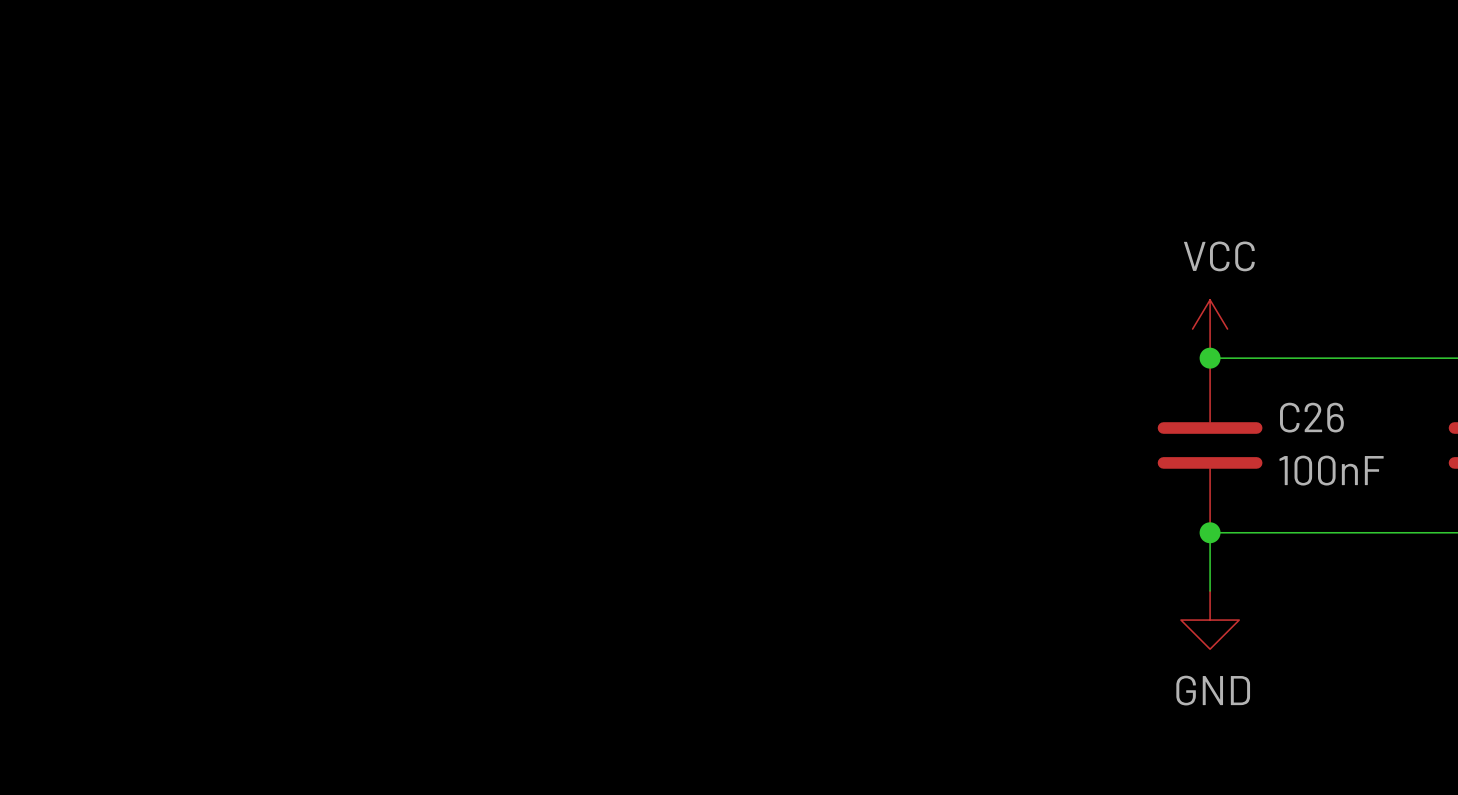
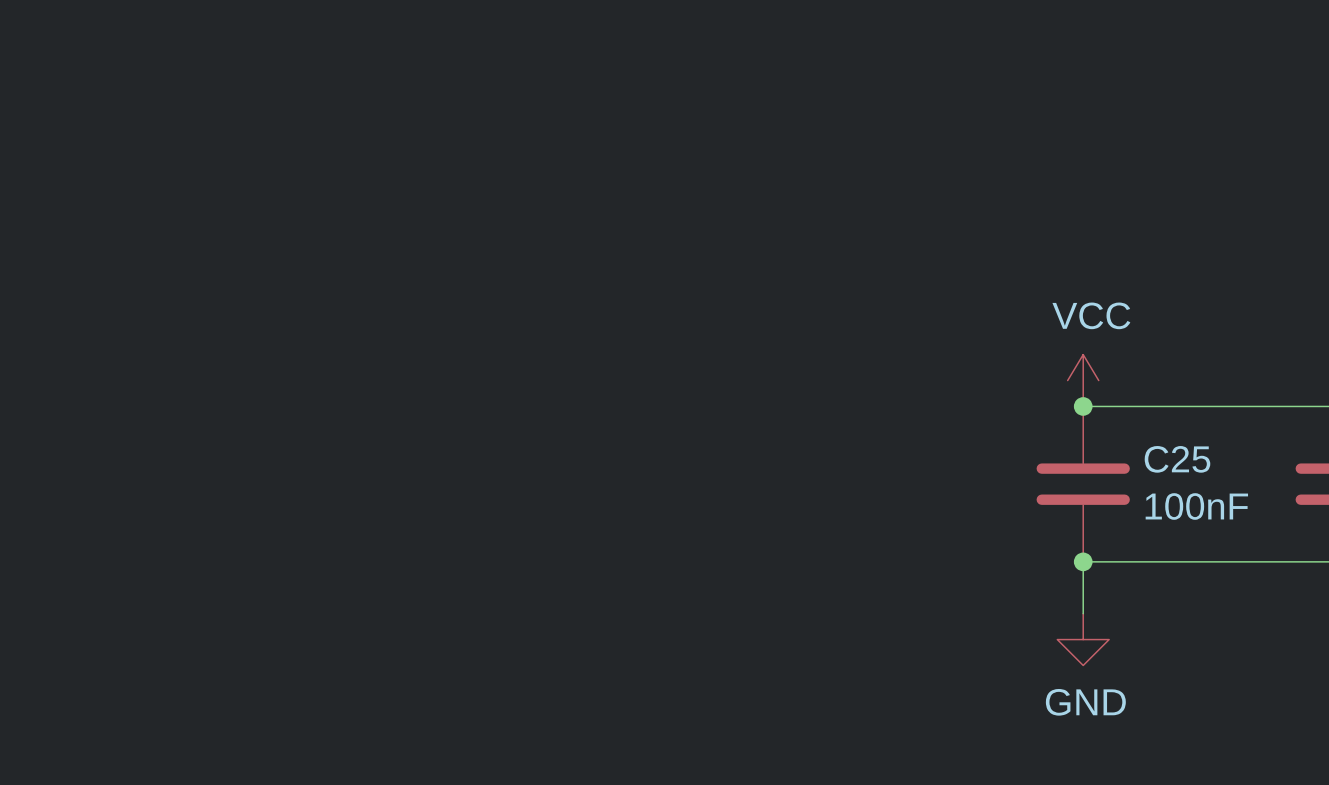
C26 name: C26 (1311, 417) -> C25 (1177, 459)

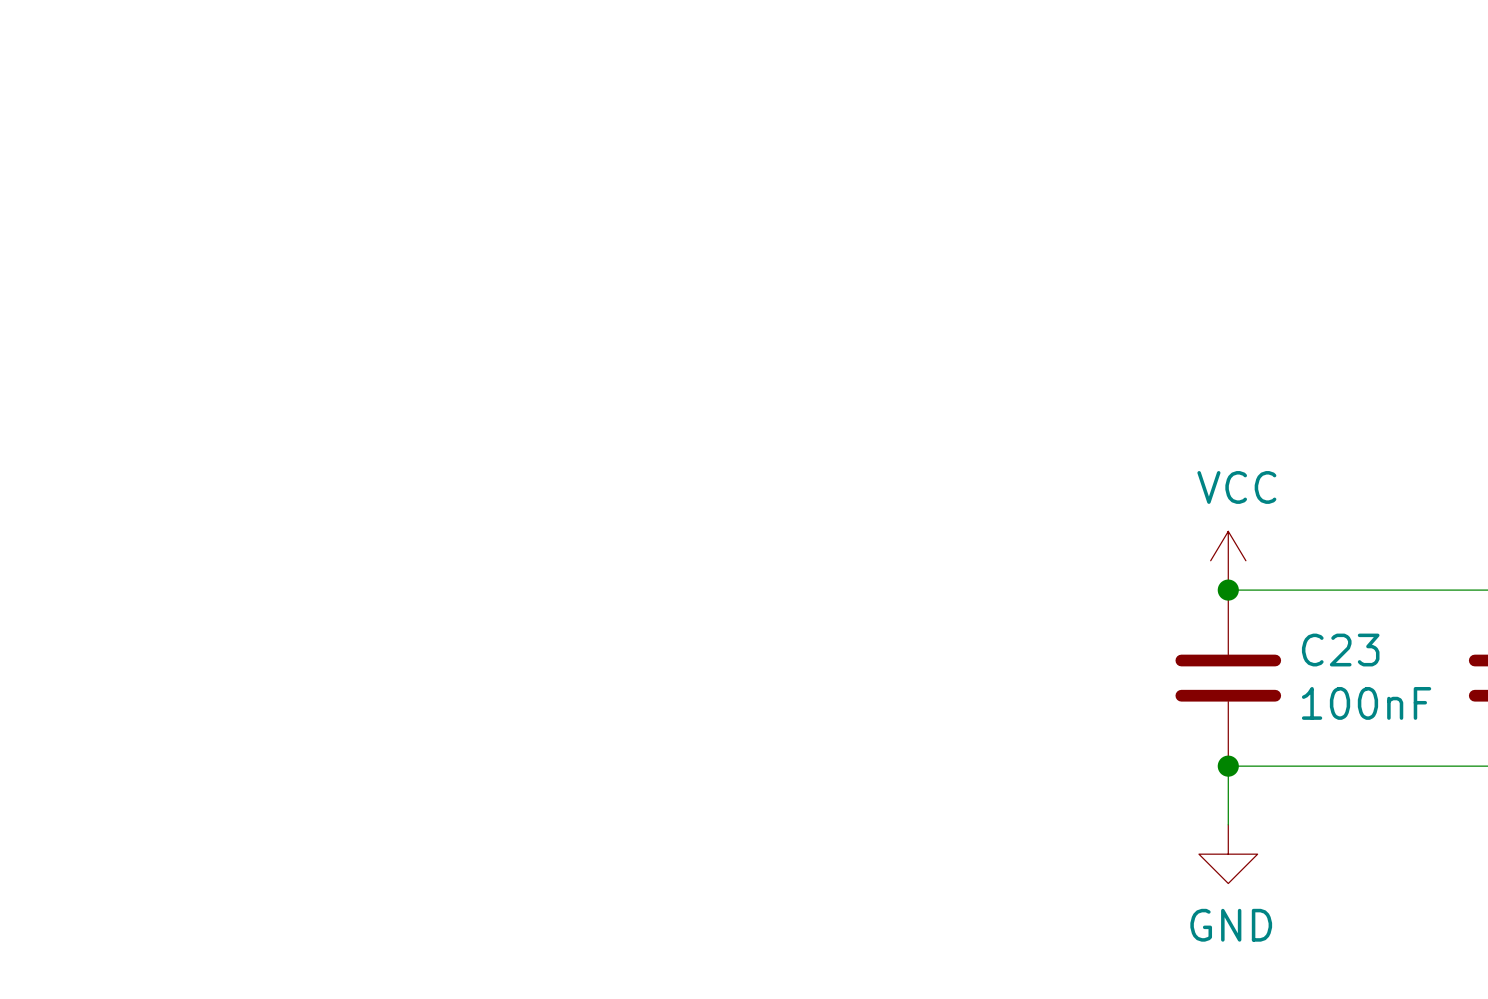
C25 name: C25 (1177, 459) -> C23 (1340, 650)

